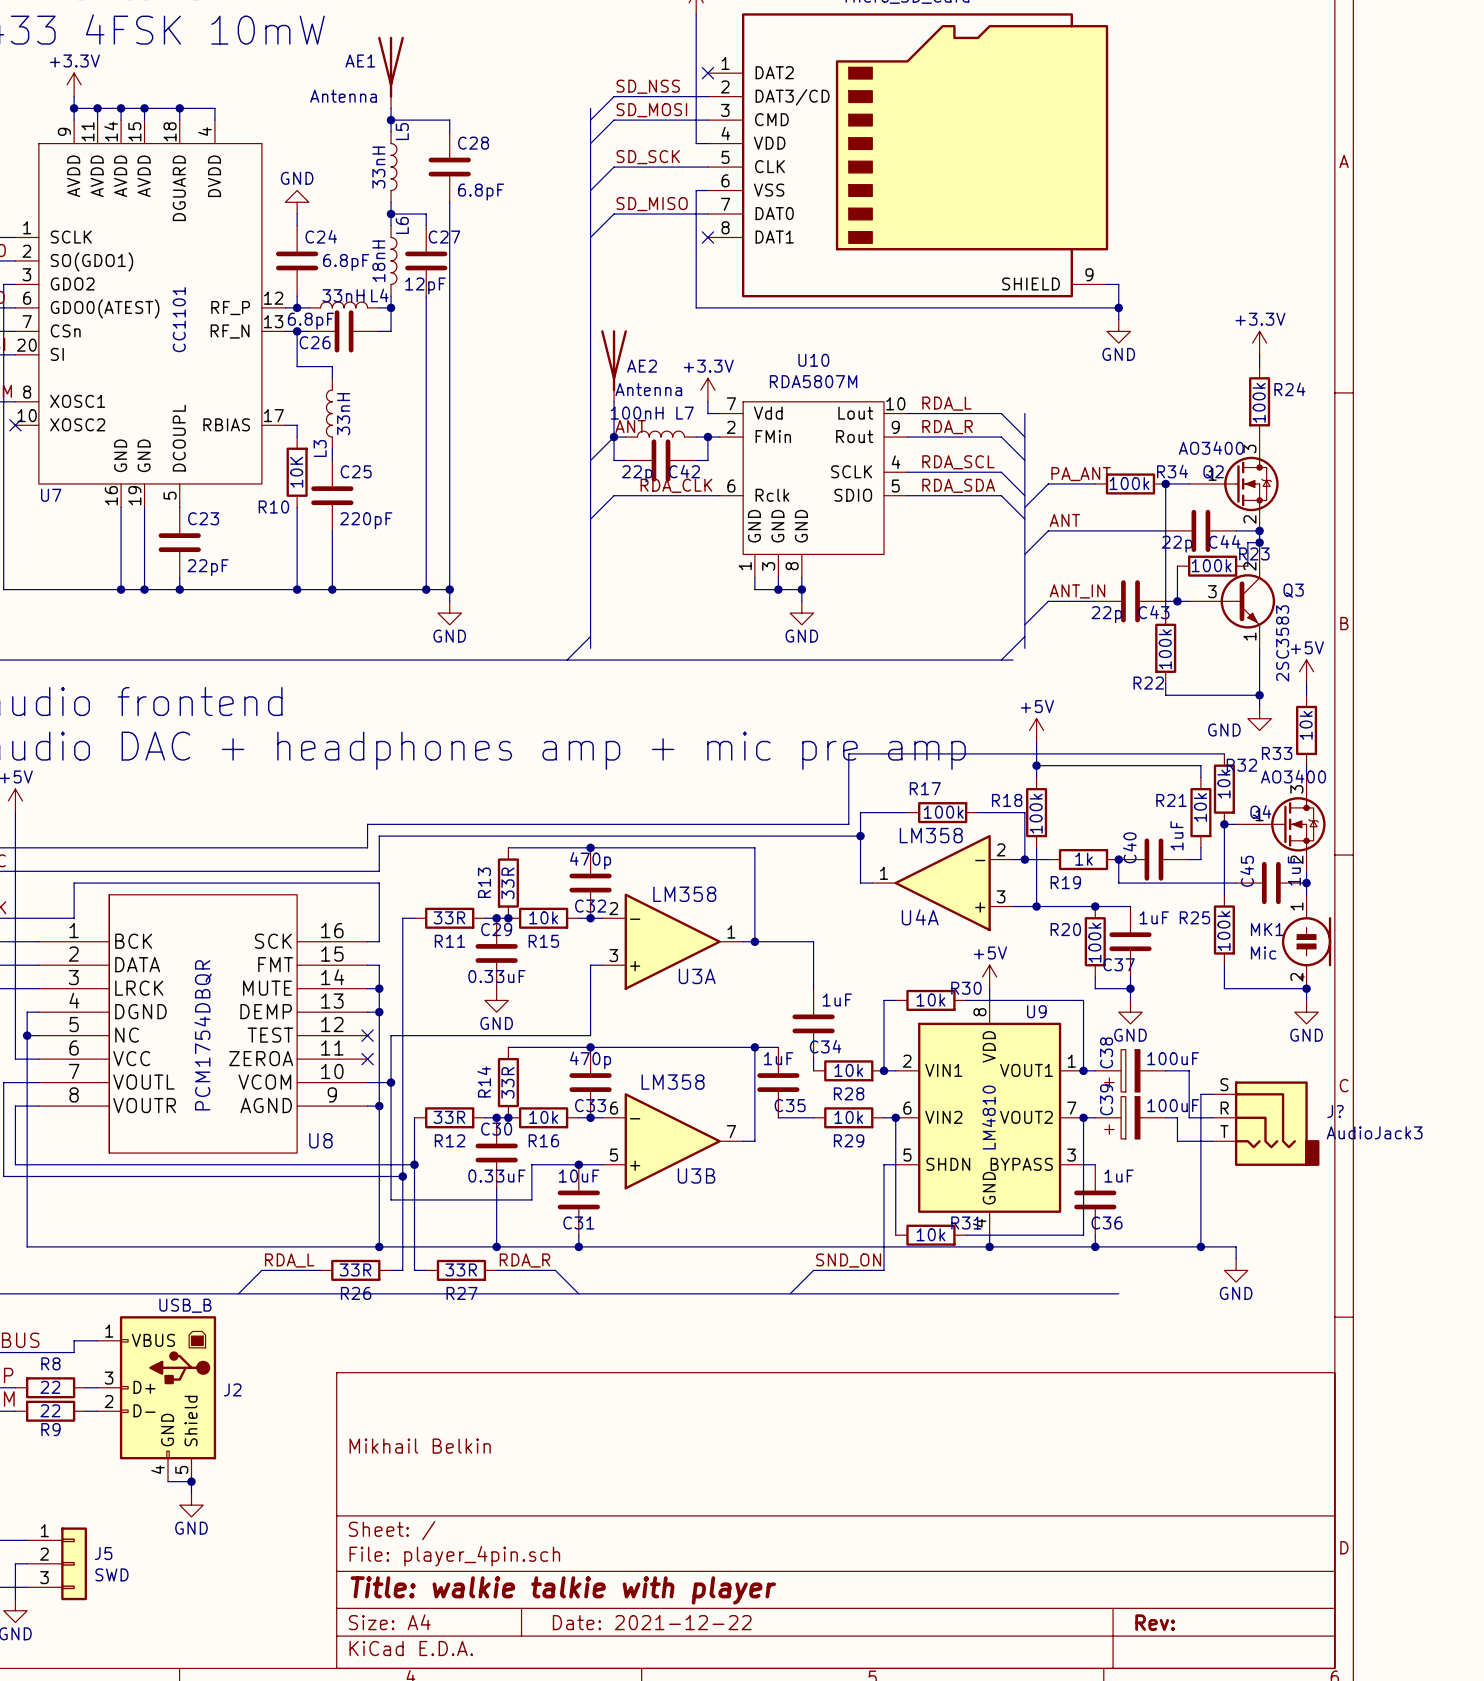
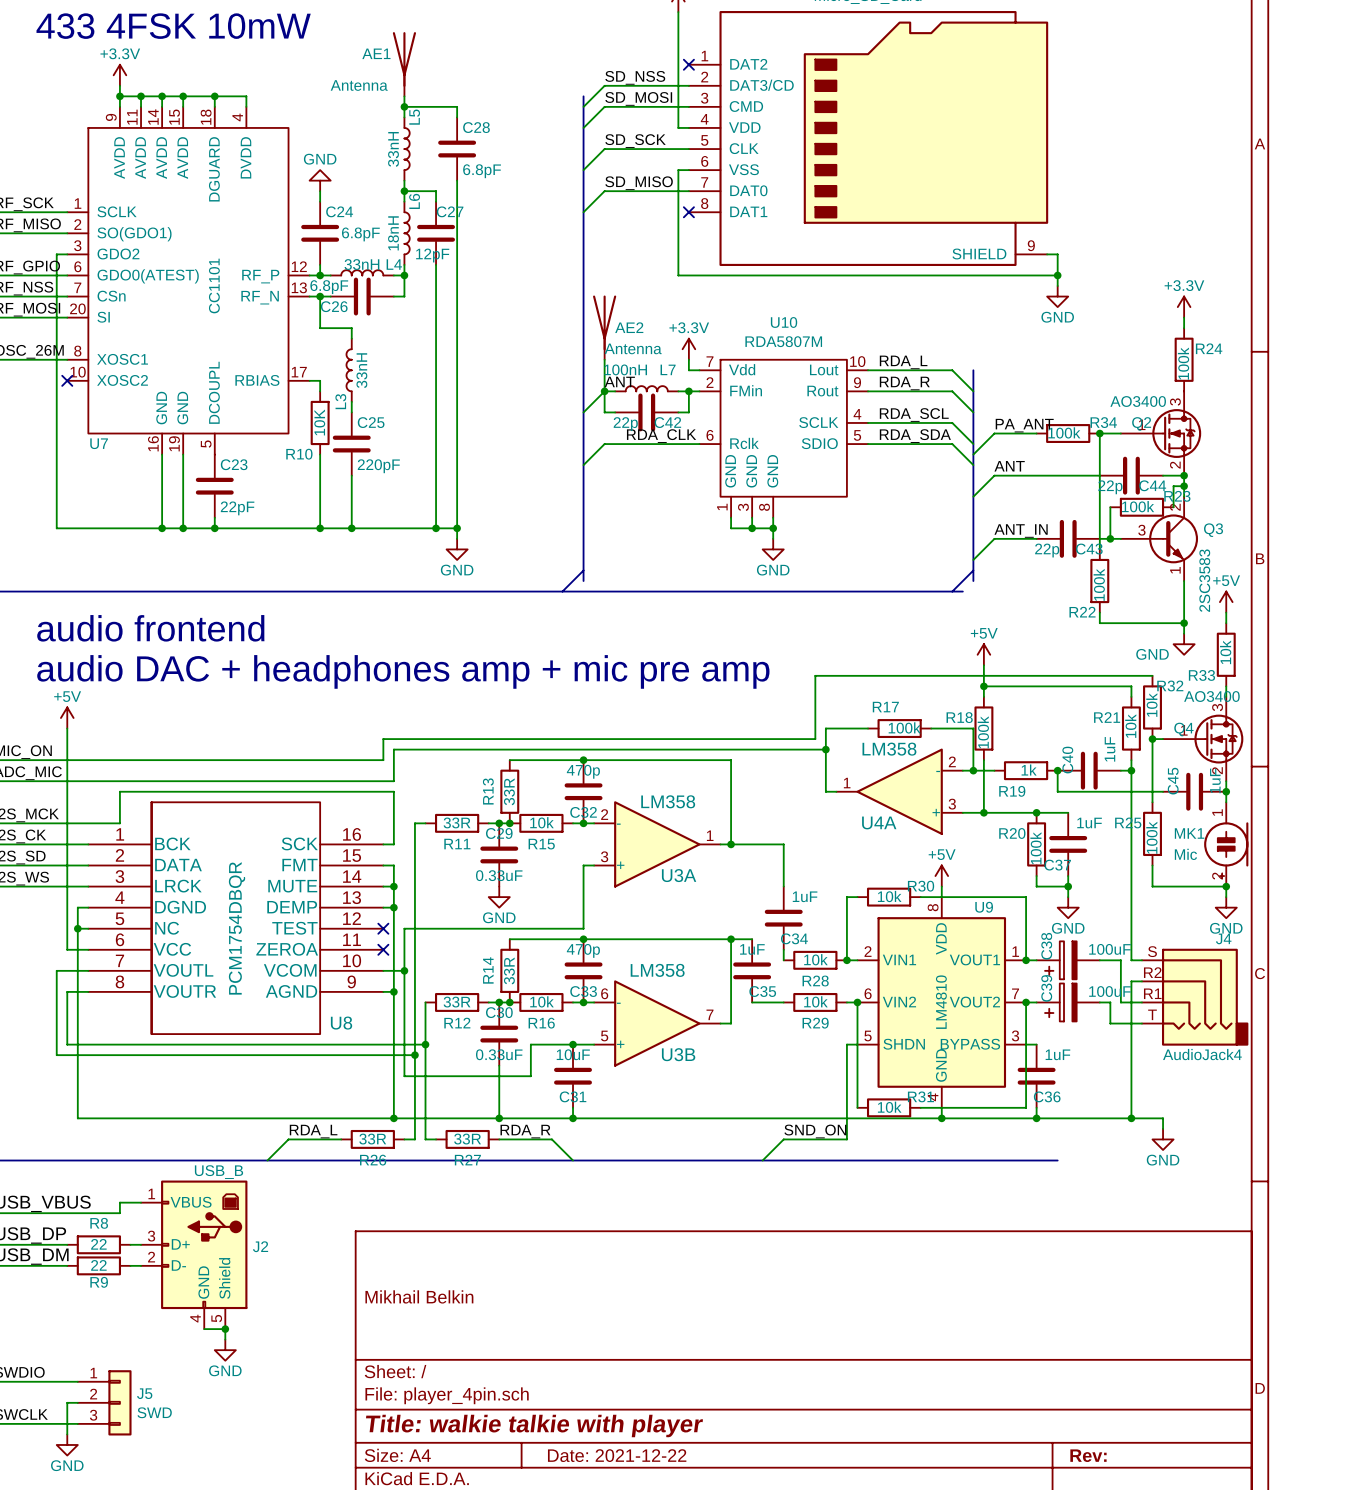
wire: none -> (1131, 770) (1131, 960) (1141, 960)
junction: none -> (1131, 770)
J4: none -> AudioJack4 (1195, 997)
J?: AudioJack3 (1266, 1123) -> none

